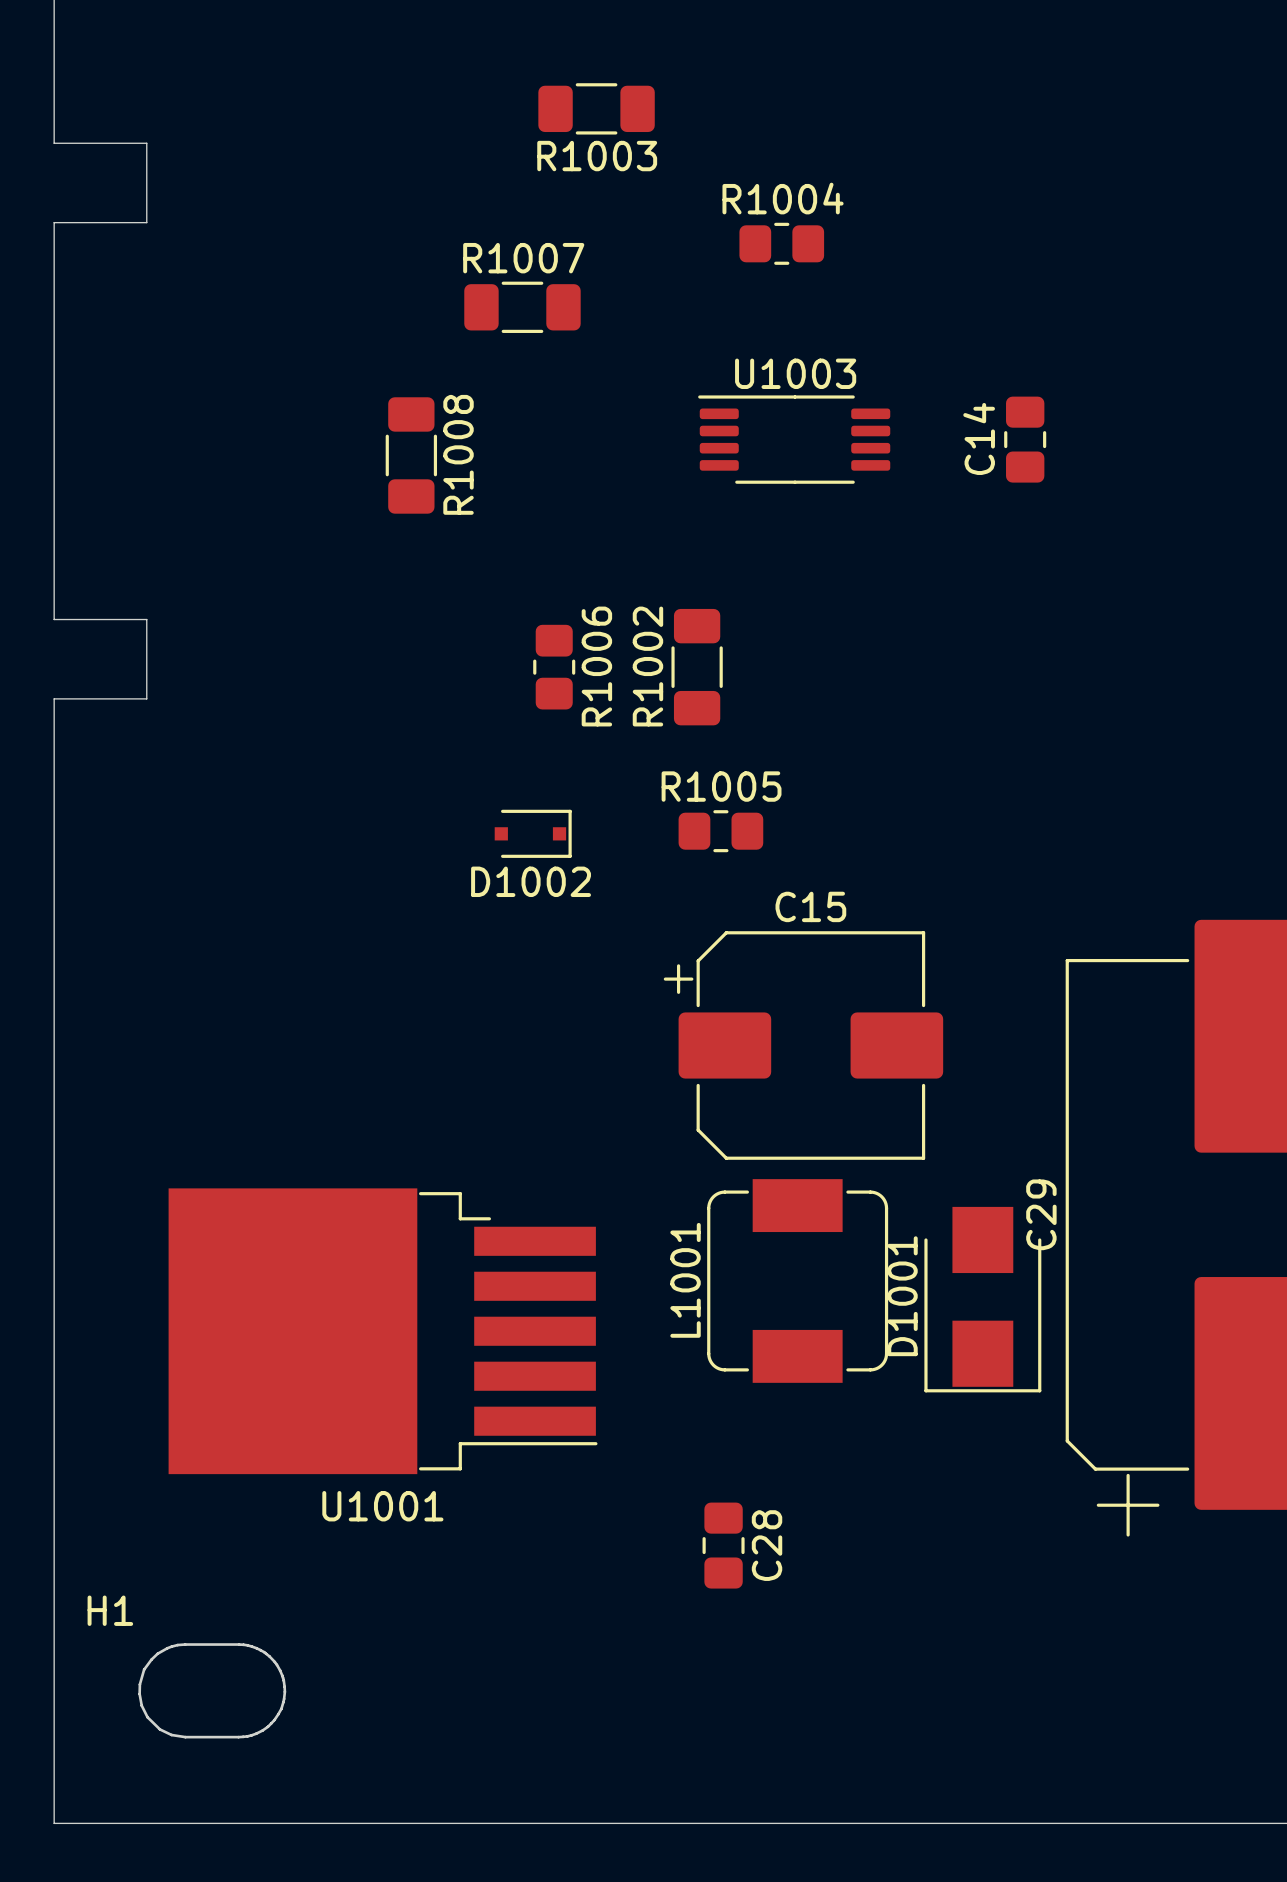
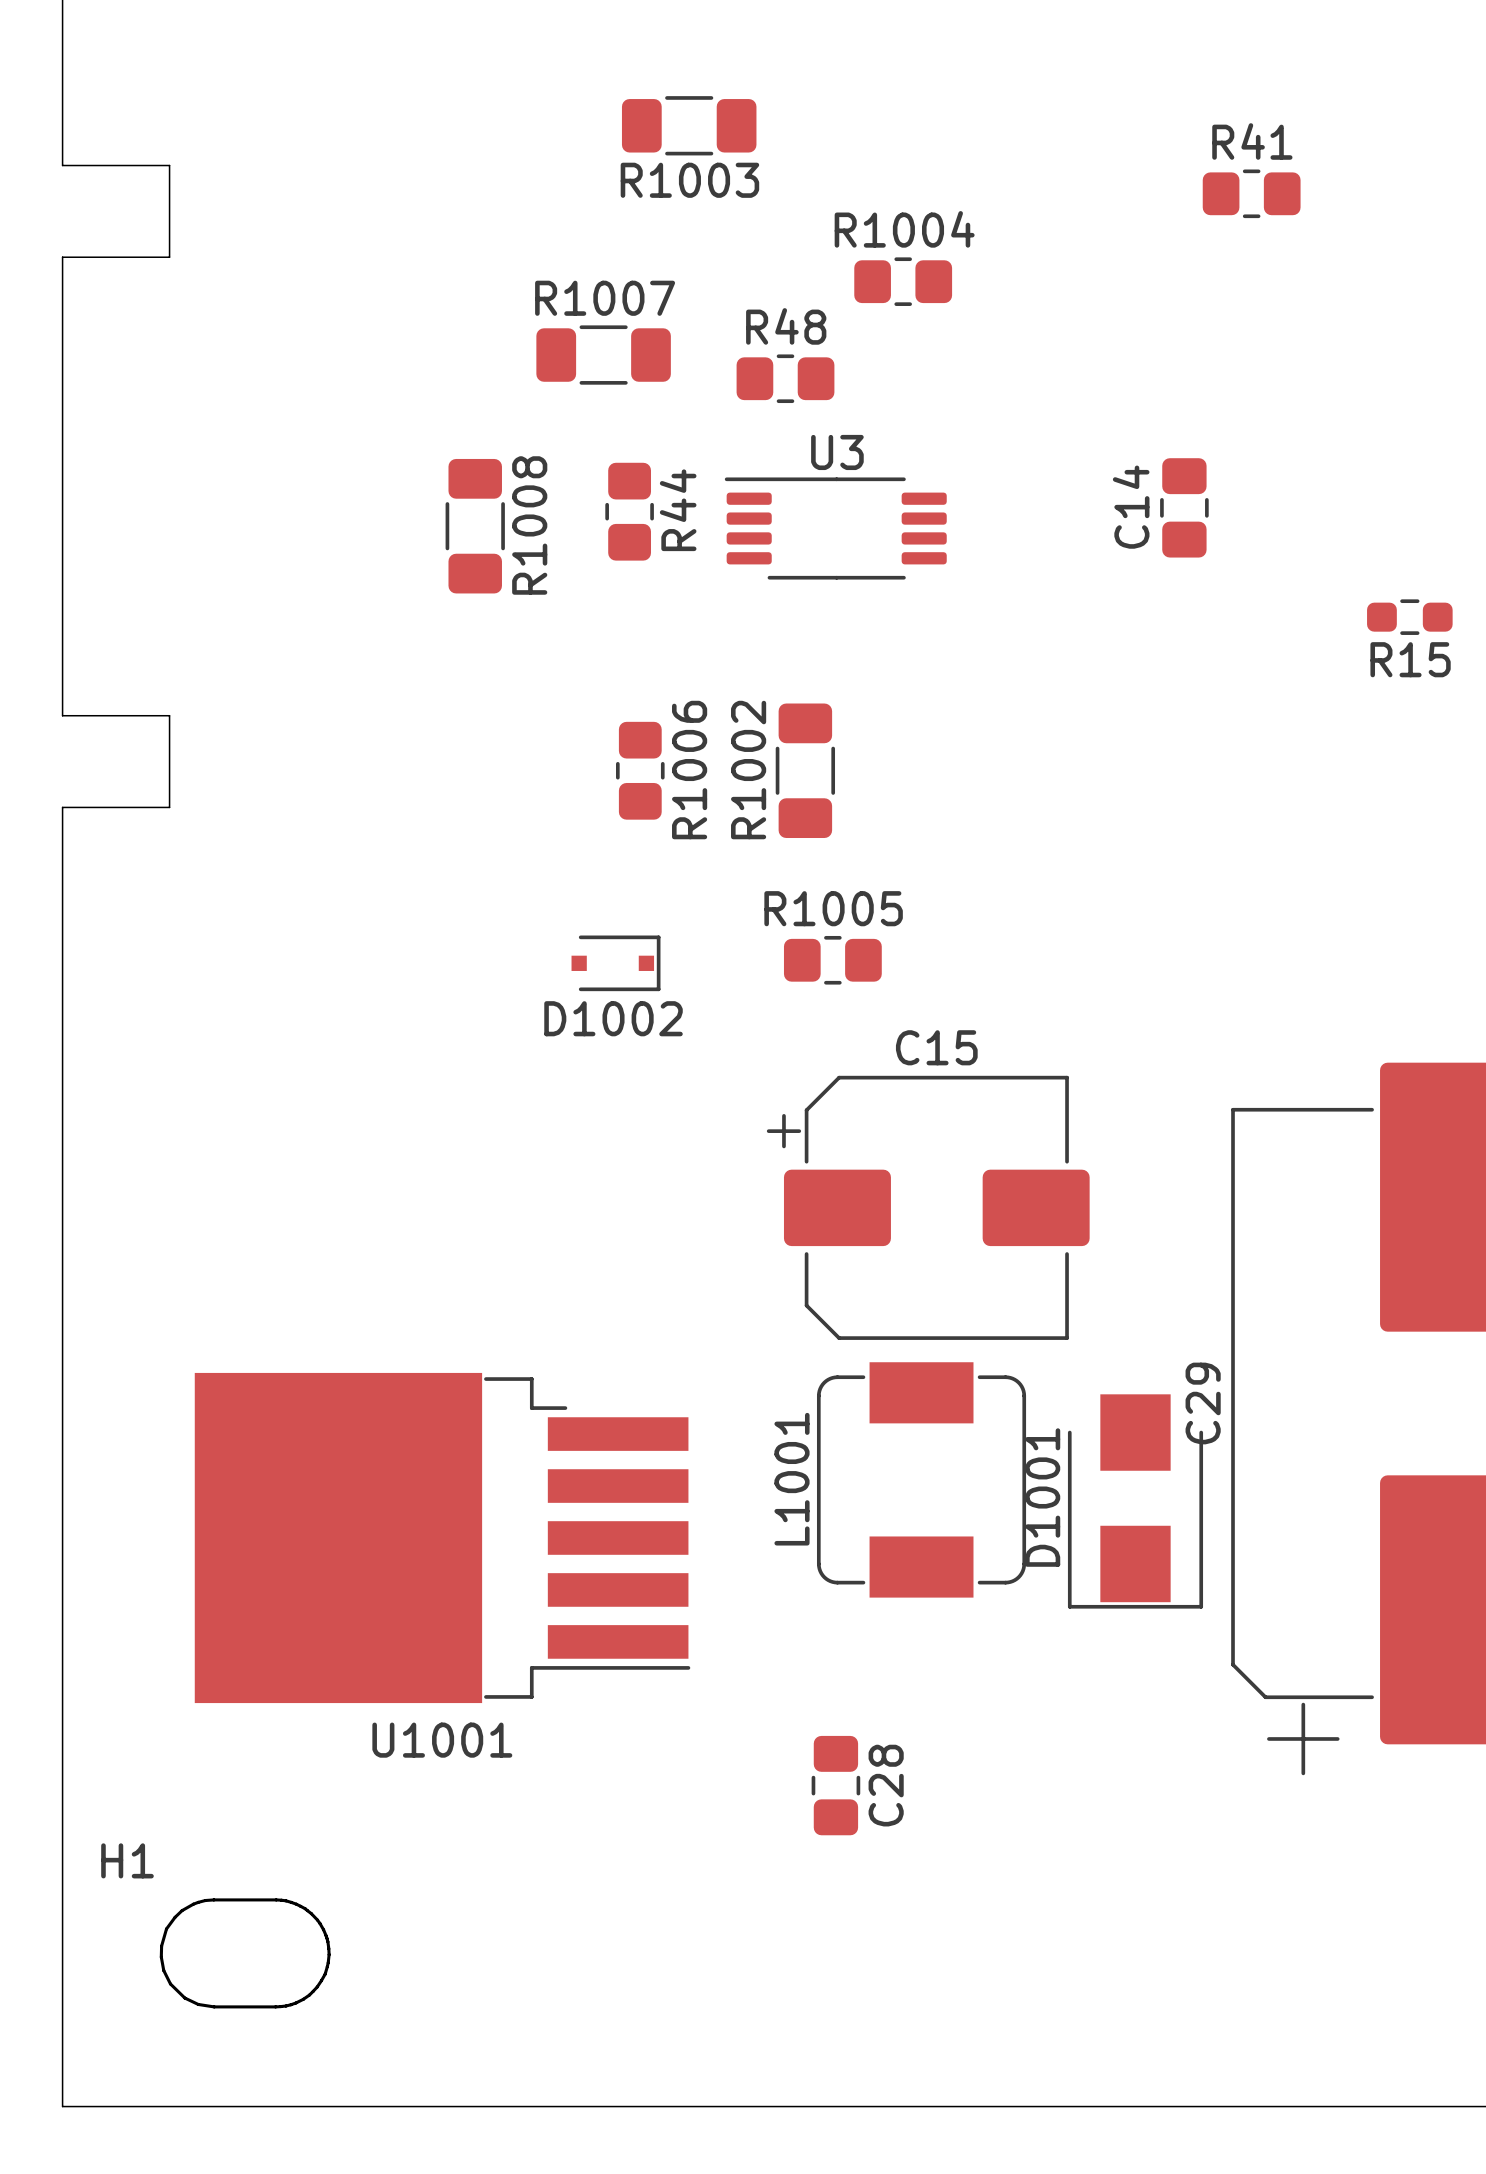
R41: none -> (1251, 193)
R48: none -> (785, 378)
U1003: (794, 439) -> none
R44: none -> (629, 511)
U3: none -> (835, 528)
R15: none -> (1409, 617)

